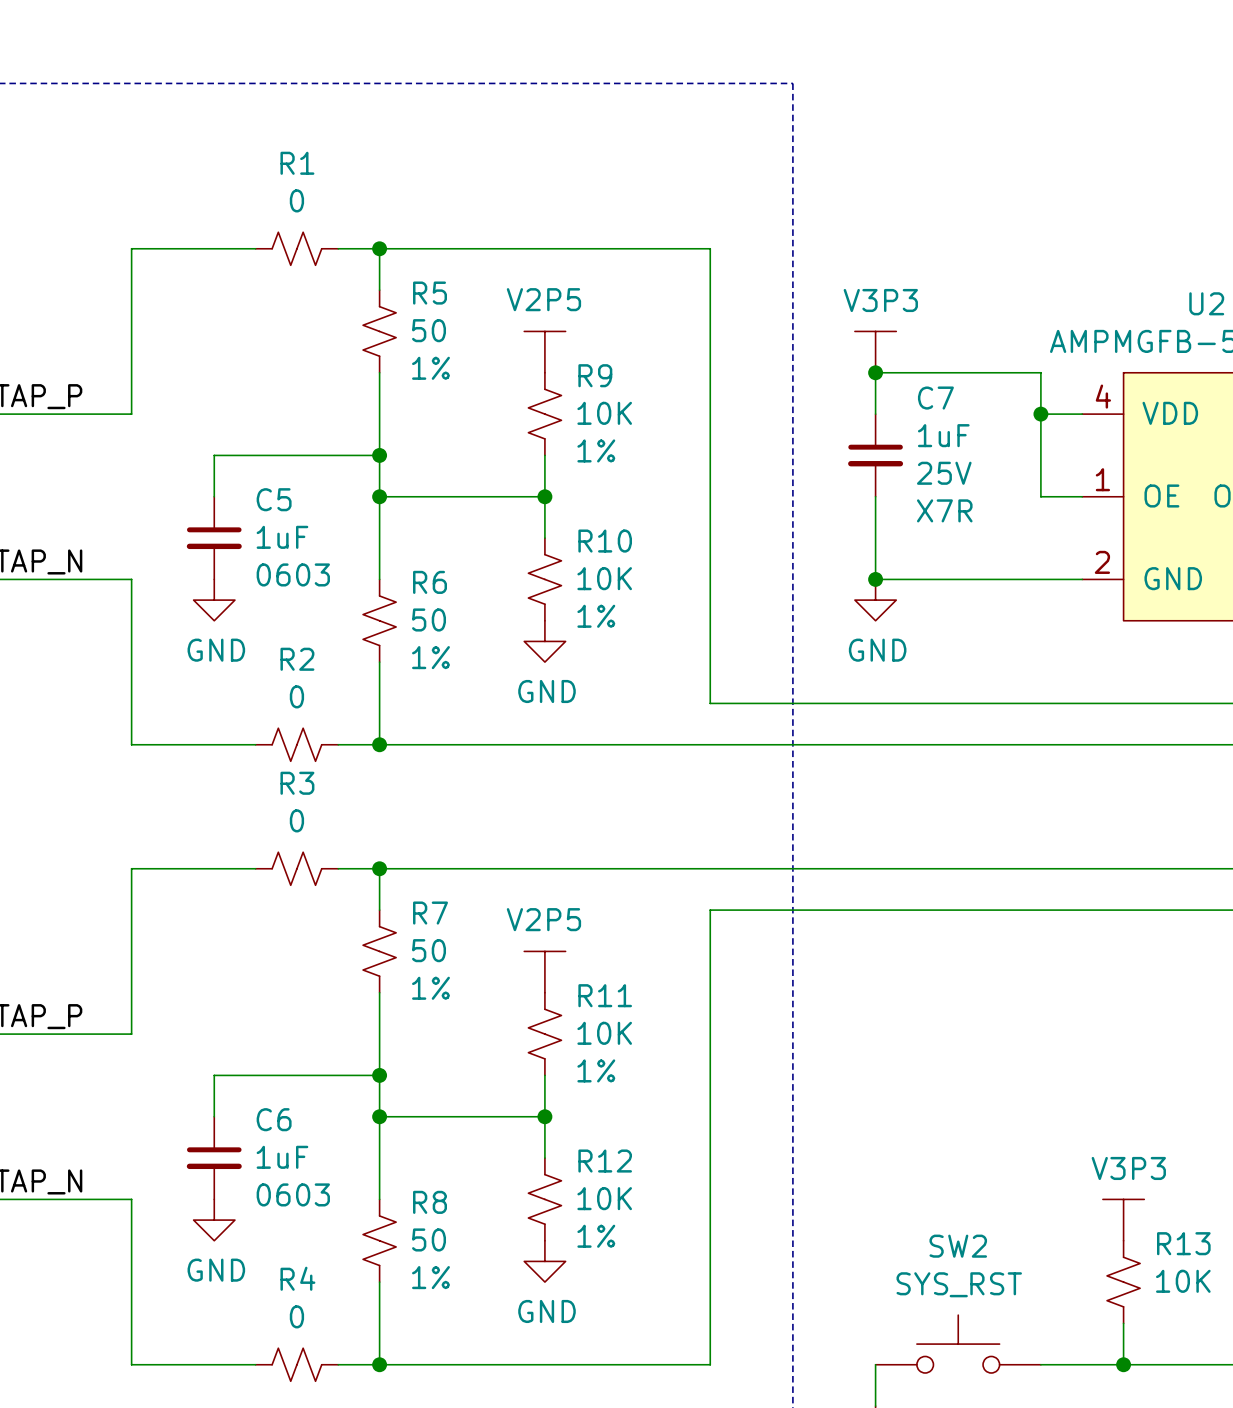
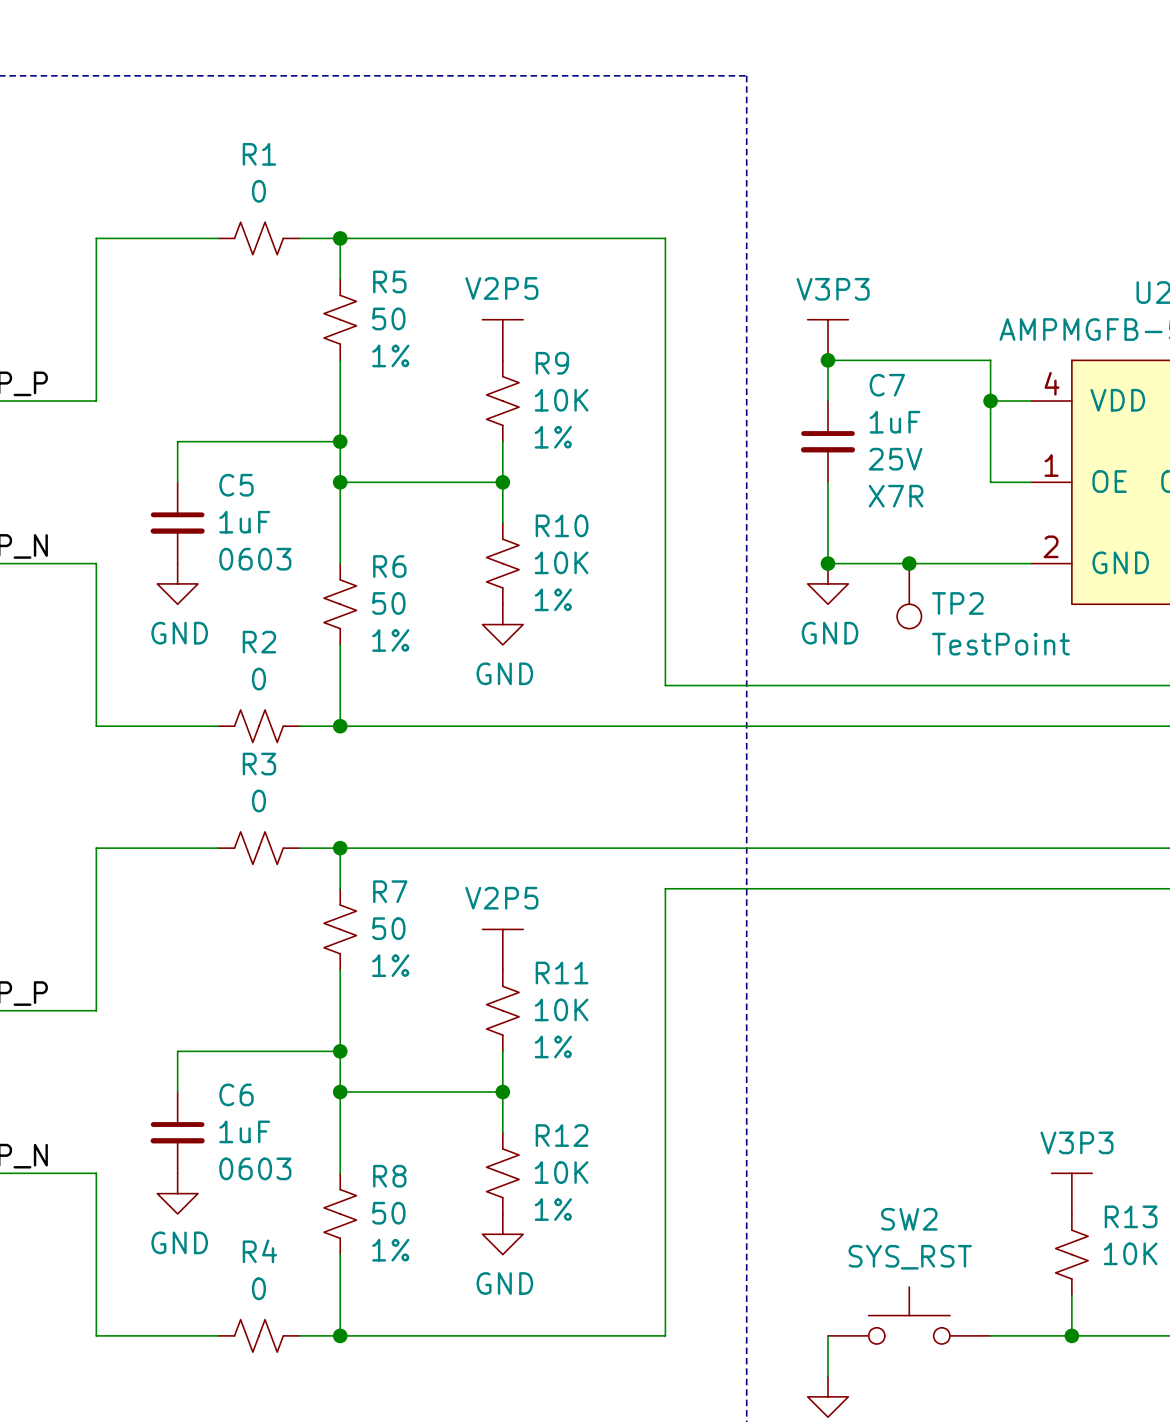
junction: none -> (909, 563)
TP2: none -> TestPoint (909, 596)

